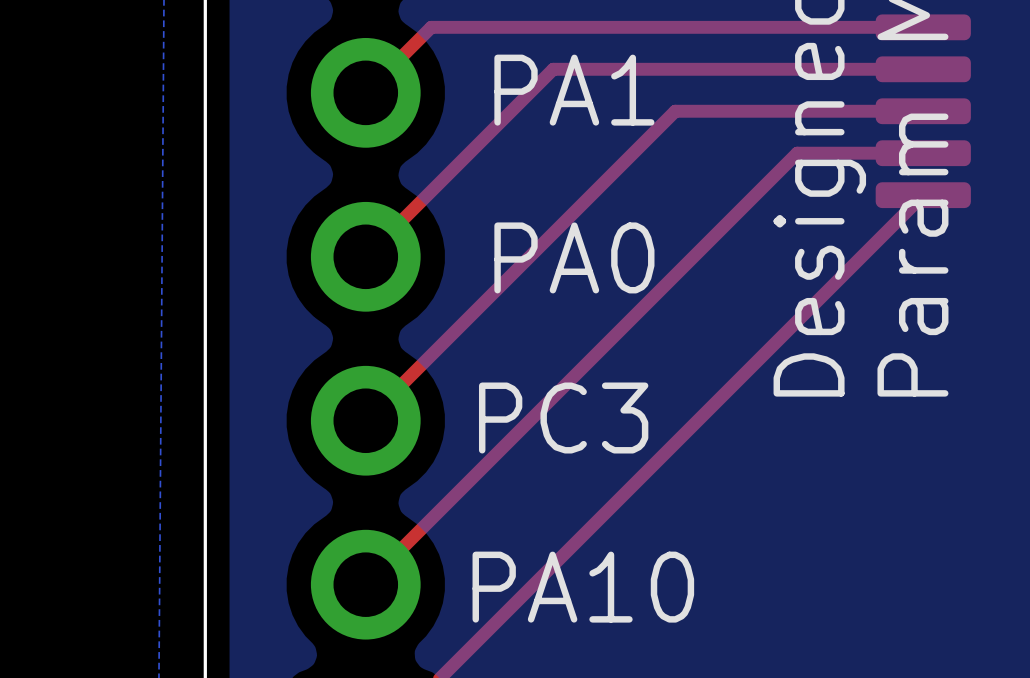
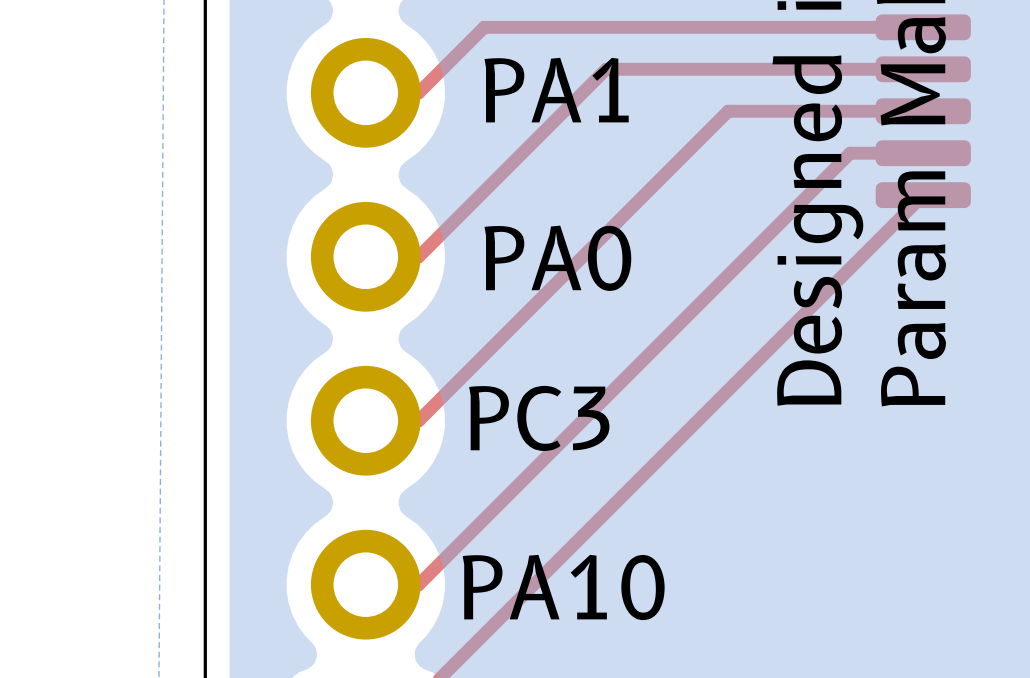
top track: (484, 27) (431, 27) (365, 92) -> (484, 27) (418, 92) (365, 92)
top track: (606, 69) (553, 69) (365, 256) -> (606, 69) (418, 256) (365, 256)
top track: (728, 111) (675, 111) (365, 420) -> (728, 111) (418, 420) (365, 420)
top track: (850, 153) (797, 153) (365, 584) -> (850, 153) (418, 584) (365, 584)

